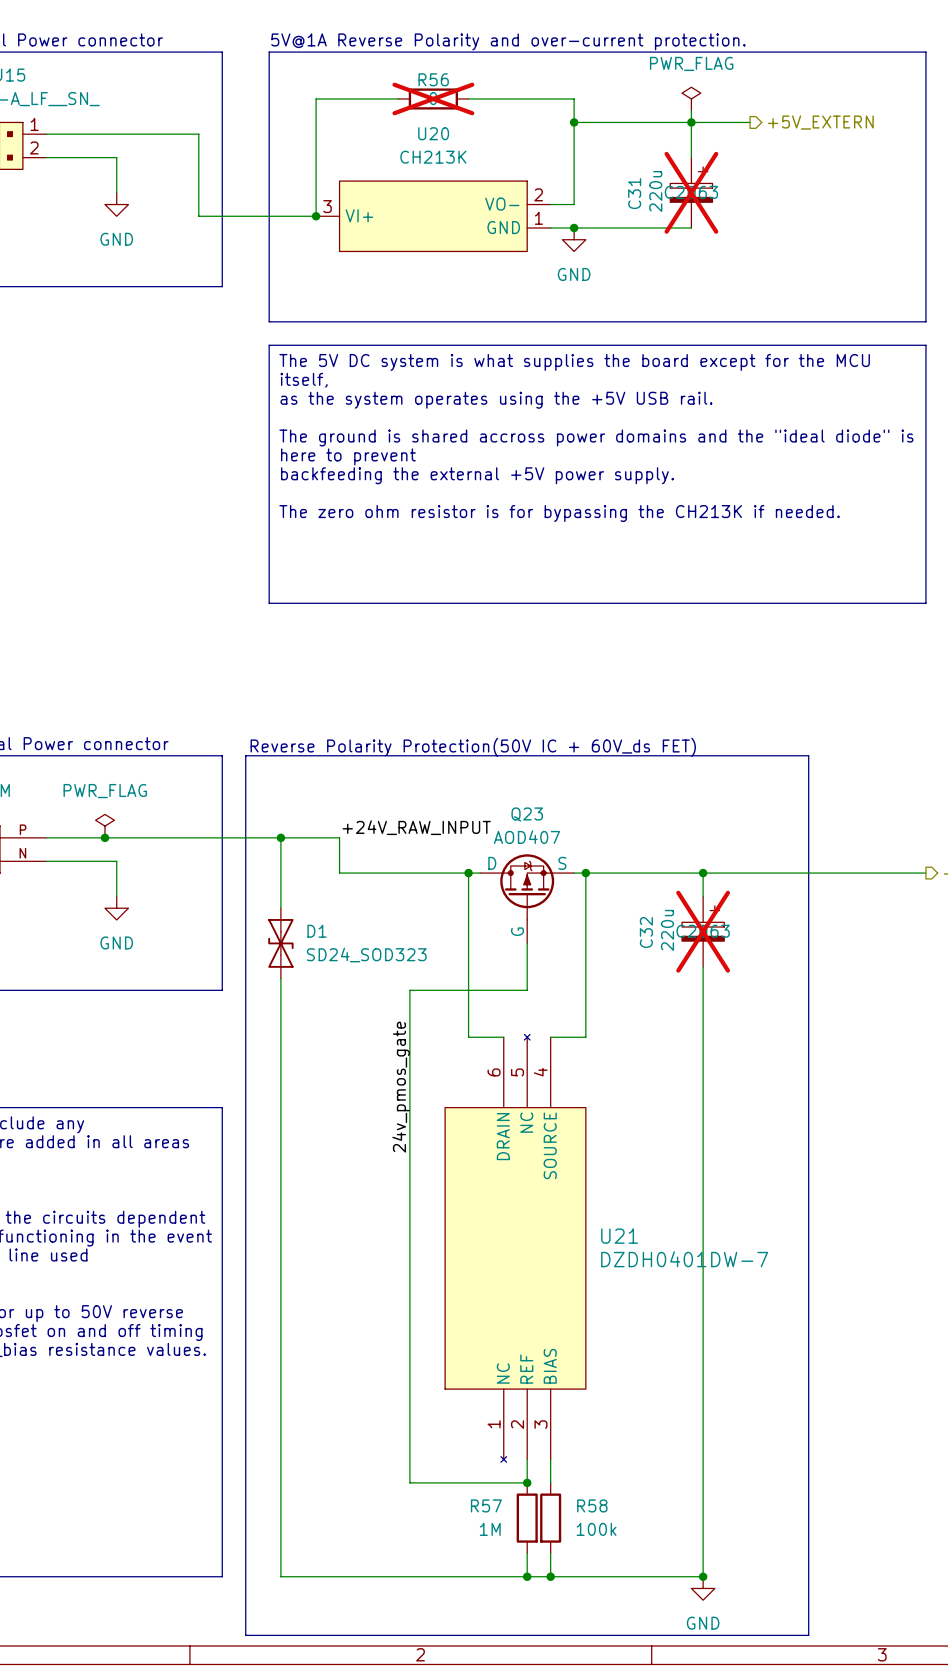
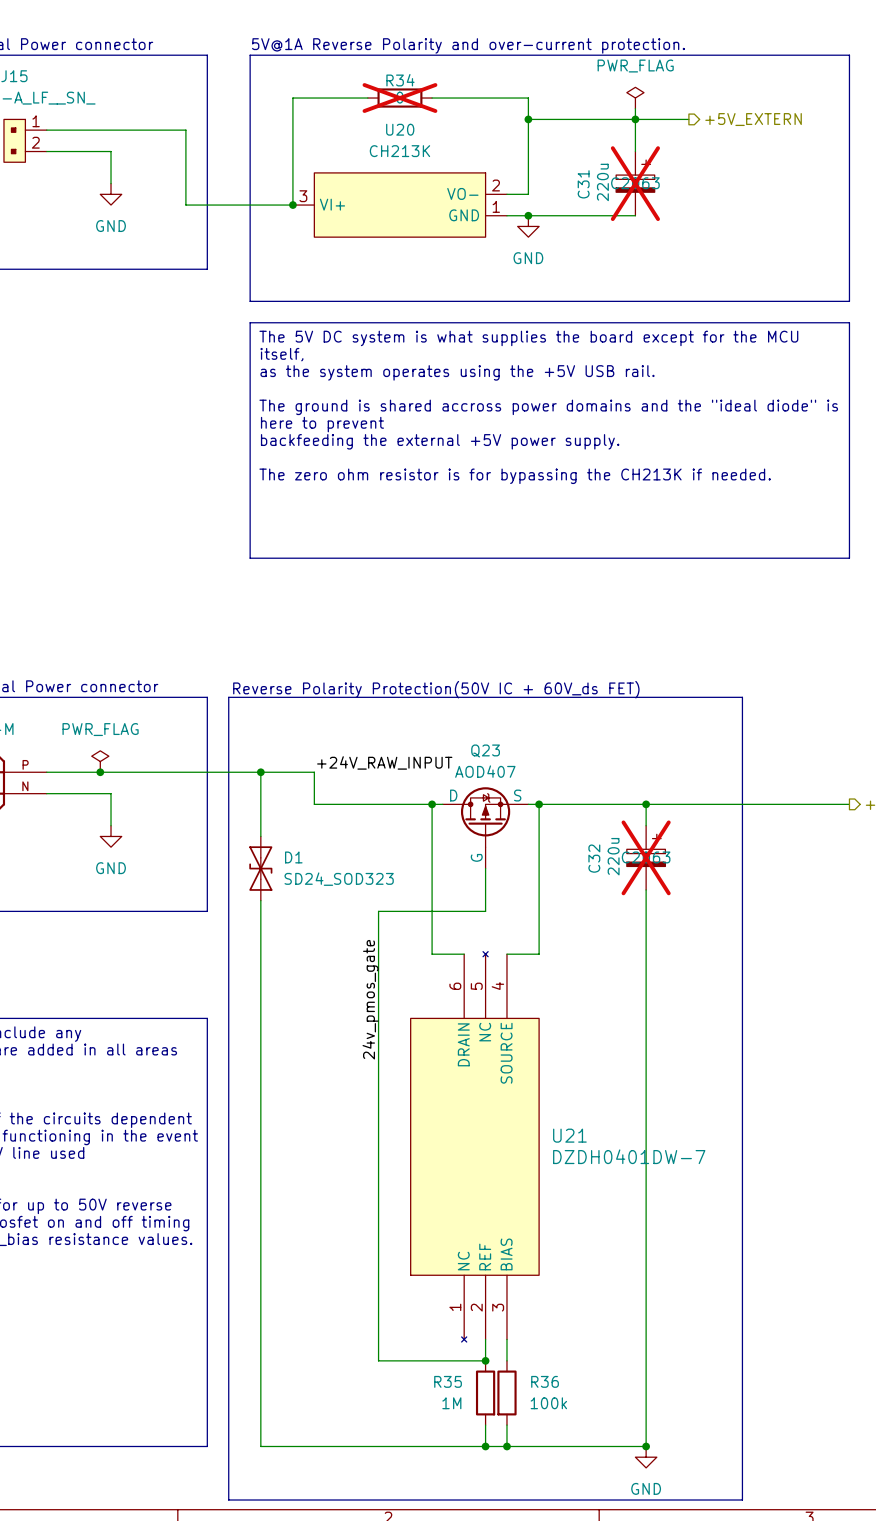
R56 name: R56 (433, 79) -> R34 (400, 80)
R57 name: R57 (486, 1505) -> R35 (448, 1381)
R58 name: R58 (592, 1505) -> R36 (545, 1381)

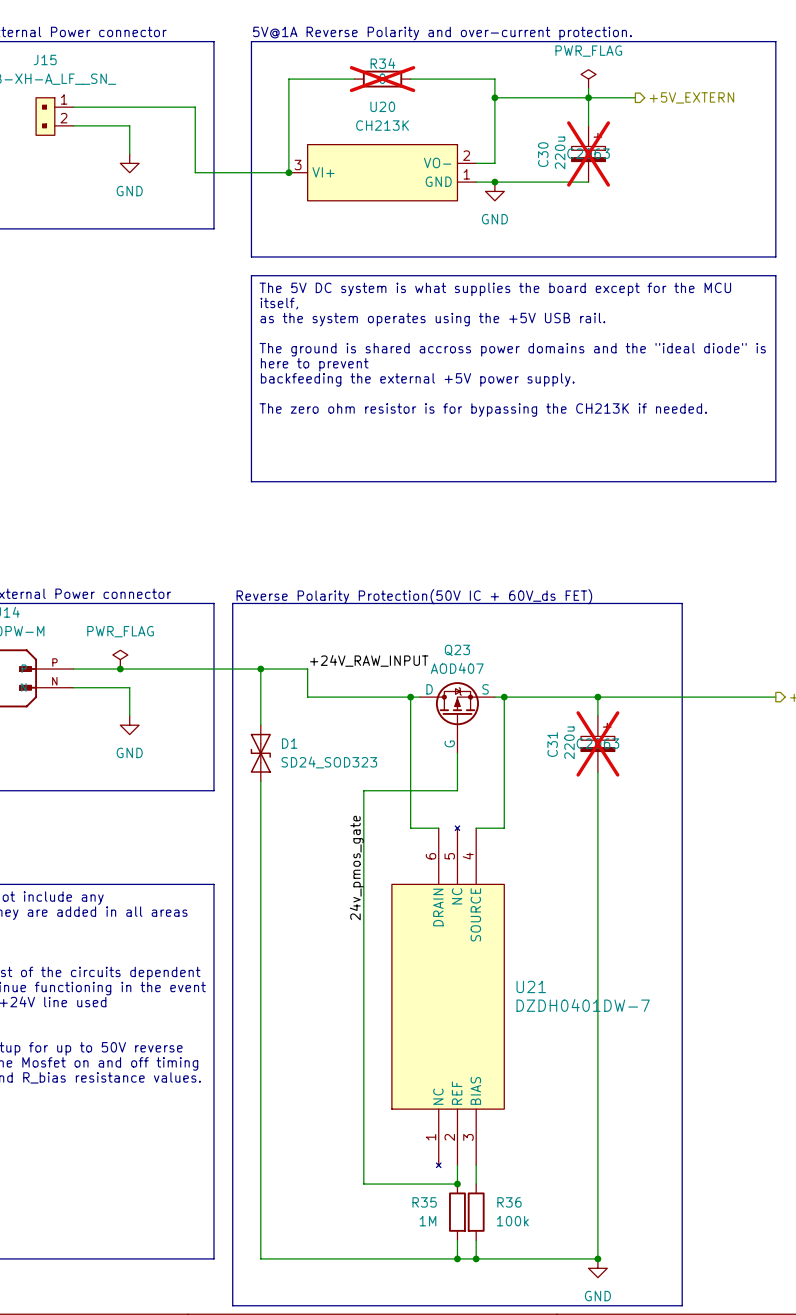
C31 name: C31 (583, 184) -> C30 (543, 154)
C32 name: C32 (594, 858) -> C31 (552, 744)

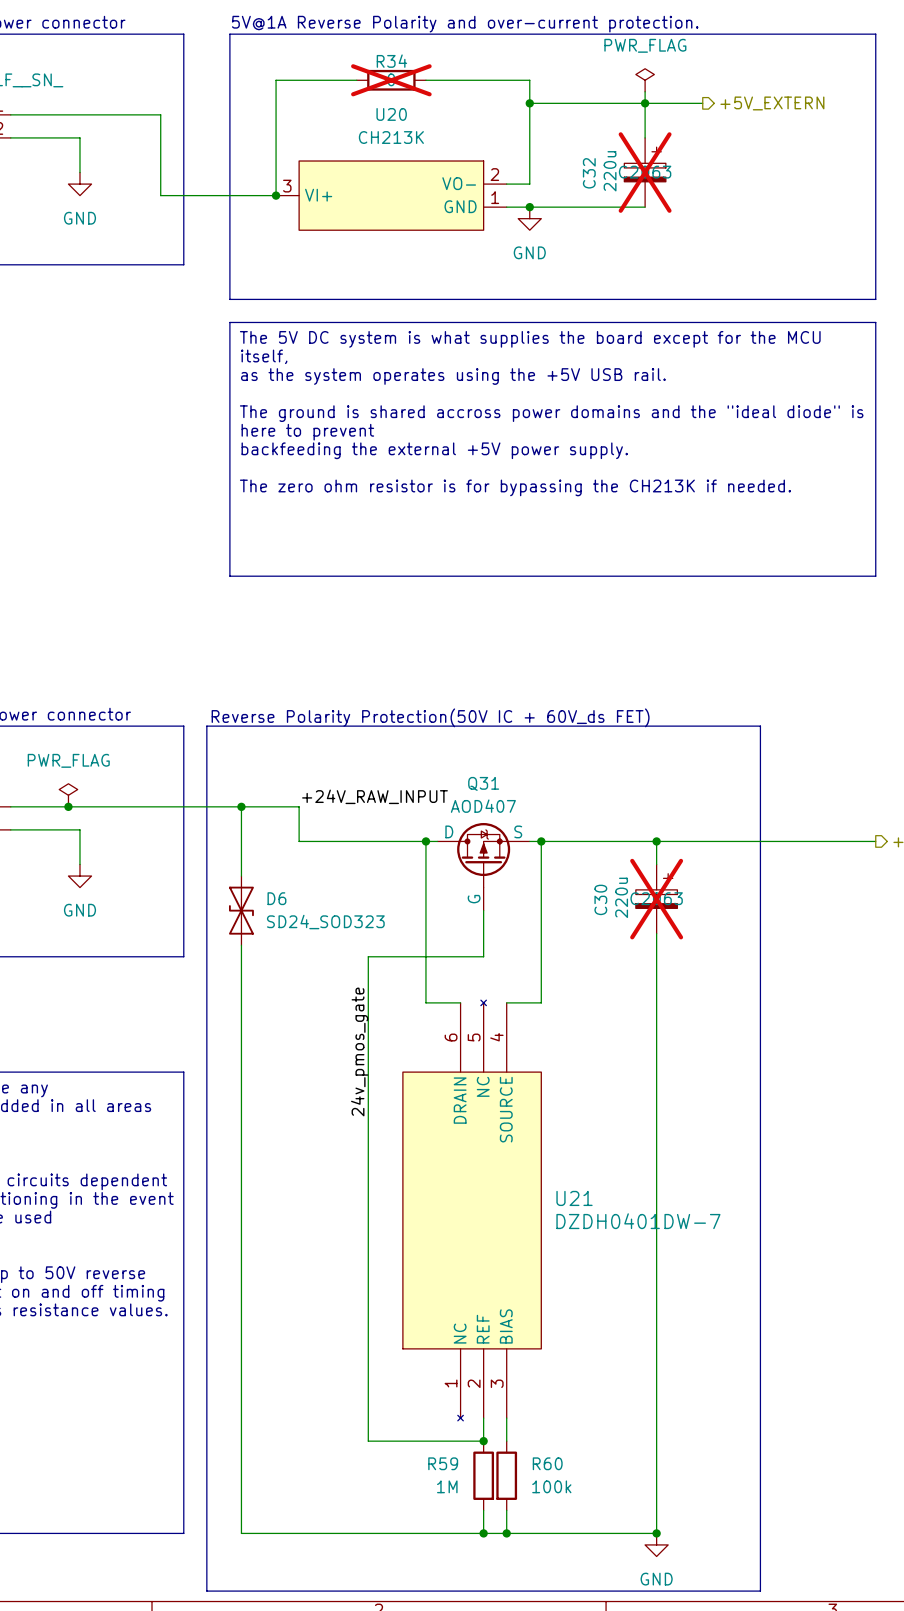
C30 name: C30 (543, 154) -> C32 (589, 173)
Q23 name: Q23 (457, 650) -> Q31 (483, 783)
D1 name: D1 (289, 743) -> D6 (276, 898)
C31 name: C31 (552, 744) -> C30 (600, 899)
R35 name: R35 (424, 1202) -> R59 (443, 1463)
R36 name: R36 (509, 1202) -> R60 (547, 1463)

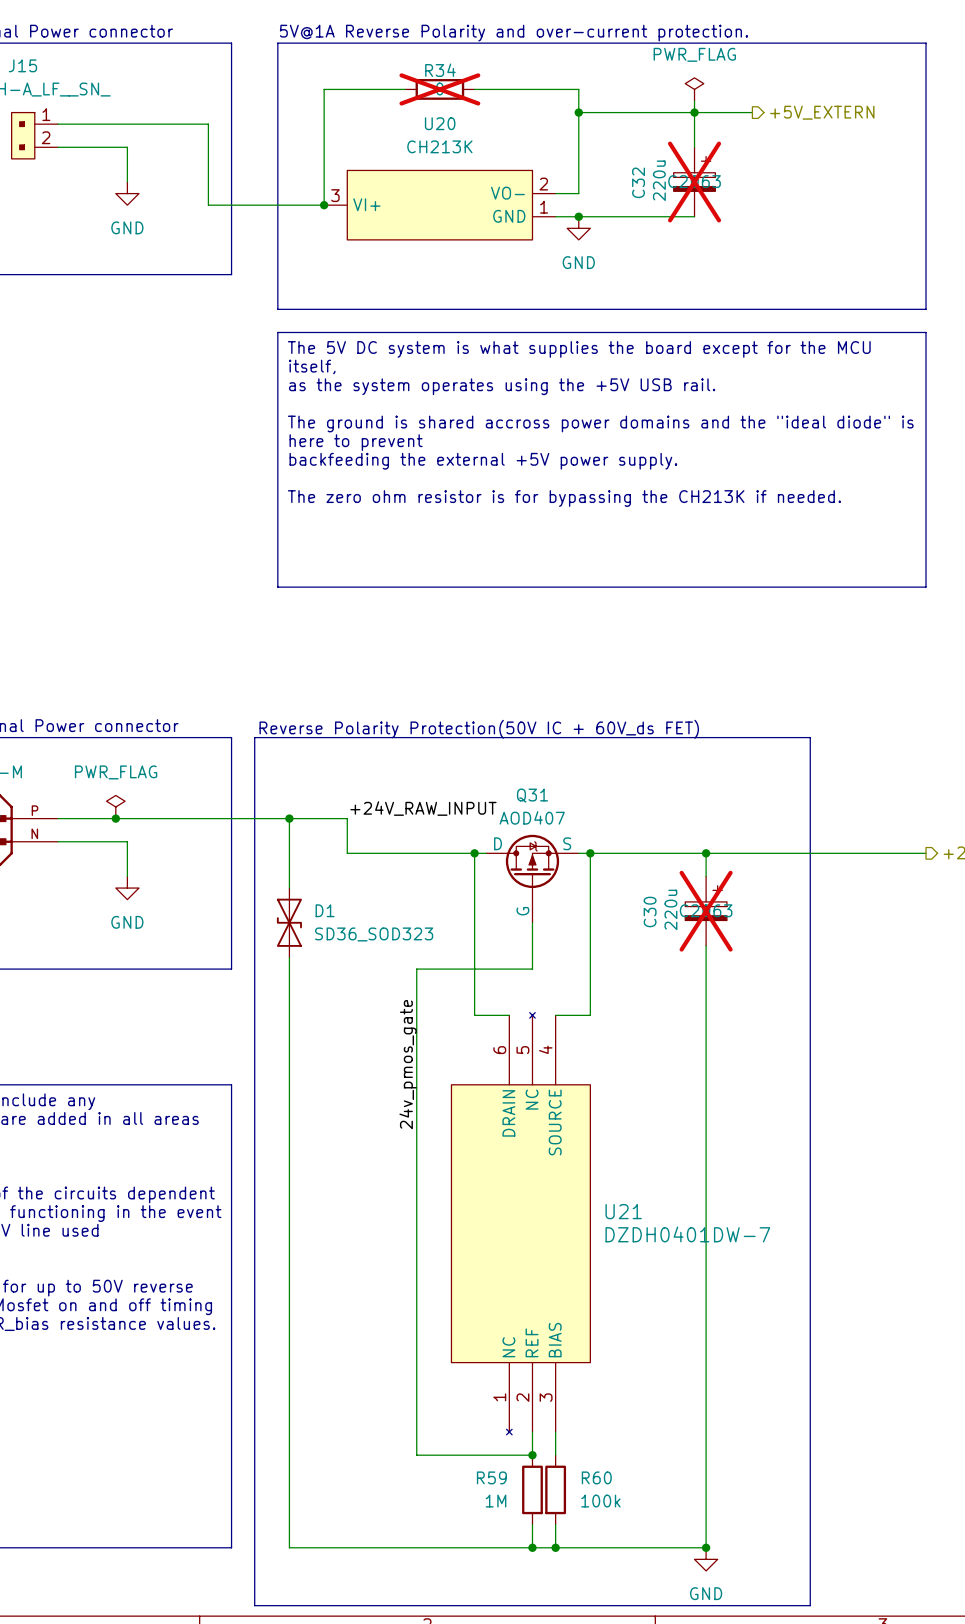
D6 name: D6 (276, 898) -> D1 (325, 910)
D6 value: SD24_SOD323 (325, 922) -> SD36_SOD323 (374, 934)

